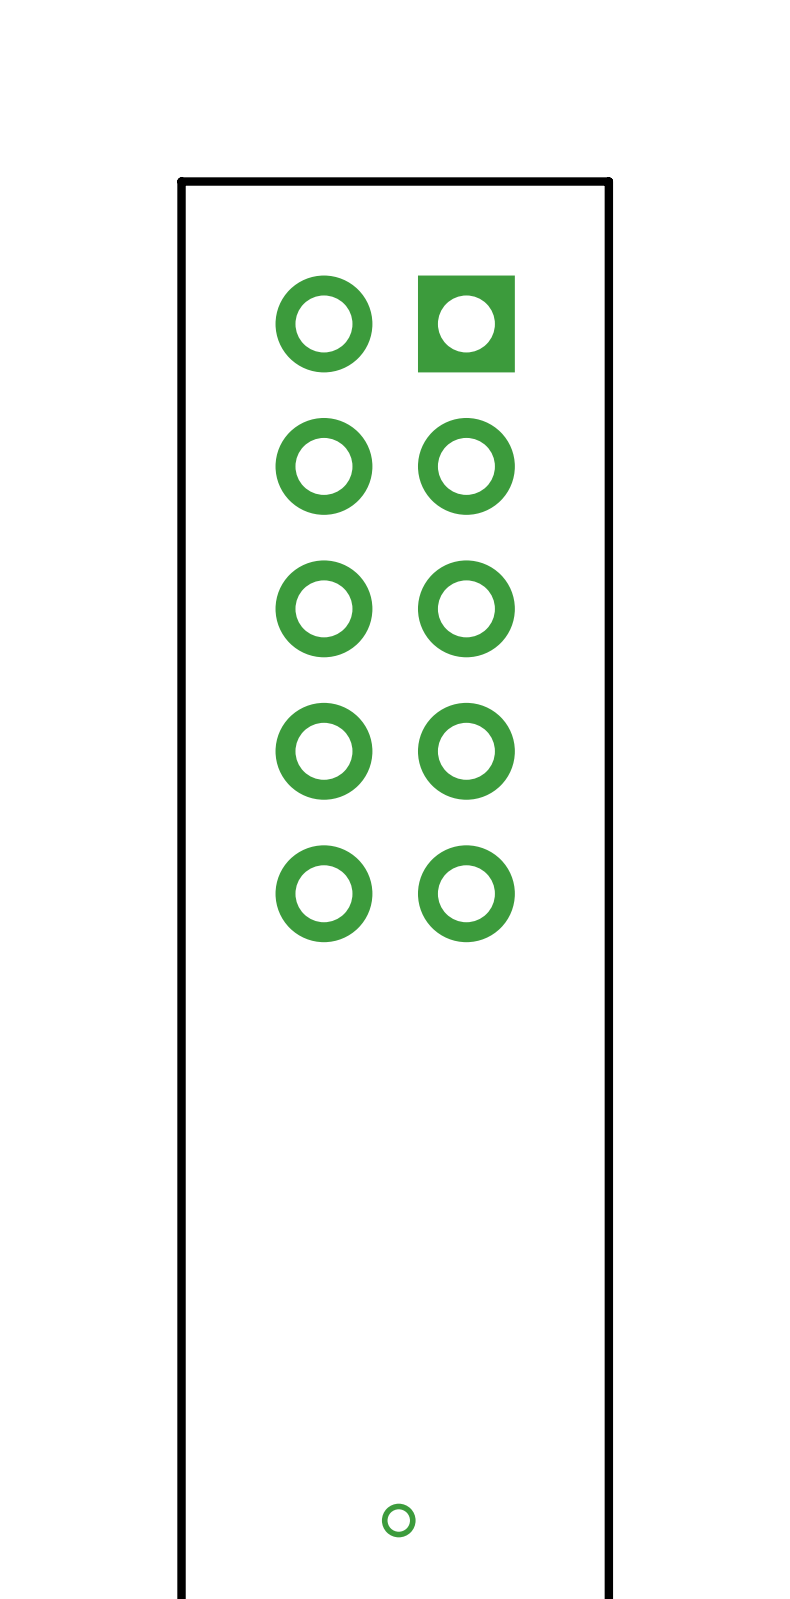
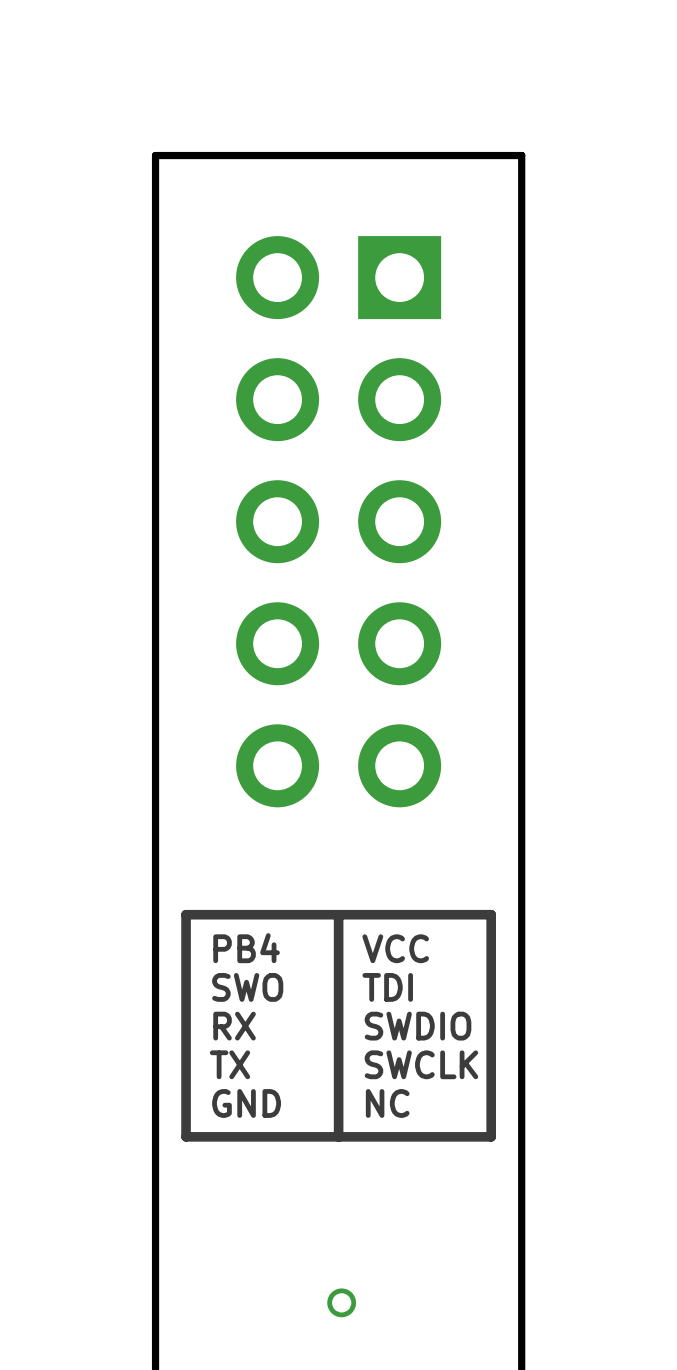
line: none -> (338, 914) (338, 1136)
line: none -> (491, 914) (186, 914) (186, 1136) (491, 1136) (491, 914)
text: none -> PB4 (246, 948)
text: none -> VCC (395, 948)
text: none -> SWO (247, 987)
text: none -> TDI (387, 987)
text: none -> RX (234, 1026)
text: none -> SWDIO (418, 1026)
text: none -> TX (229, 1064)
text: none -> SWCLK (421, 1064)
text: none -> GND (246, 1103)
text: none -> NC (387, 1103)

